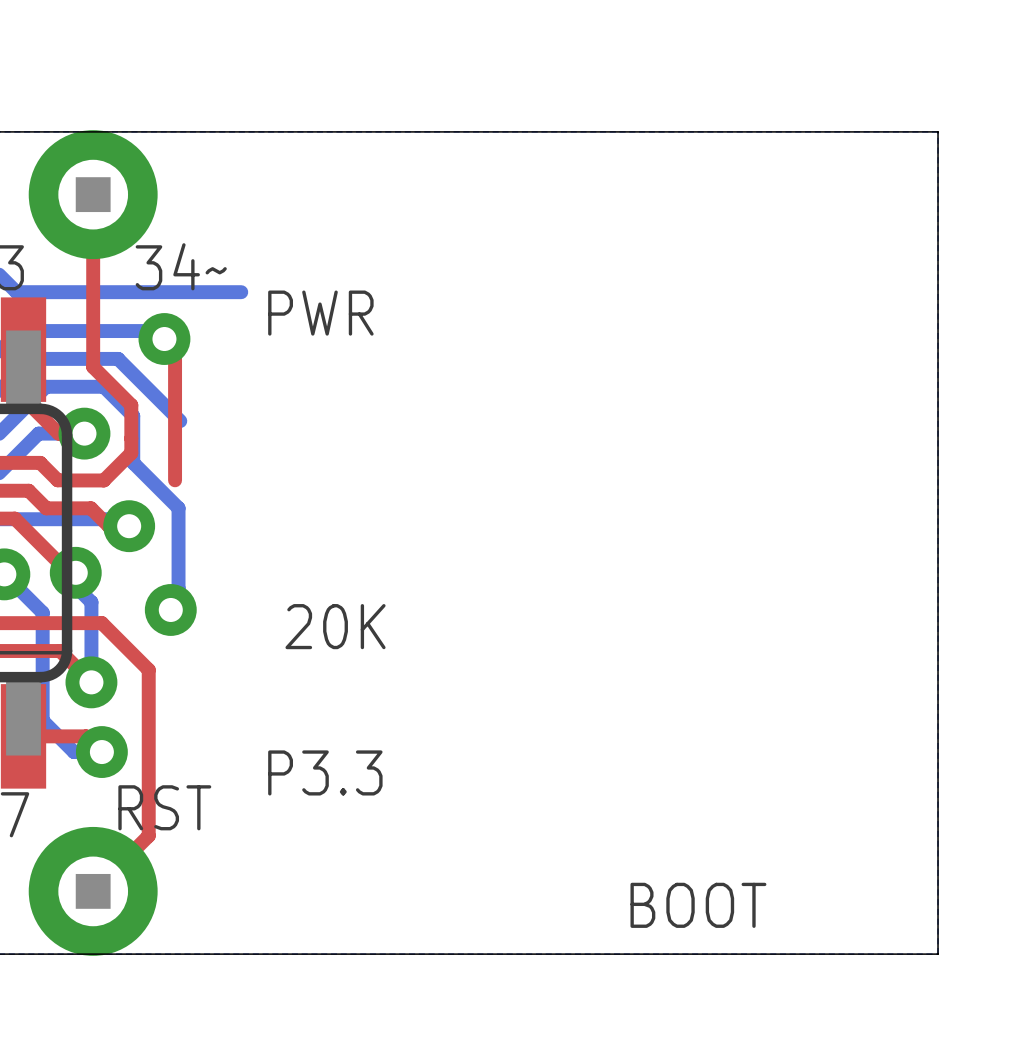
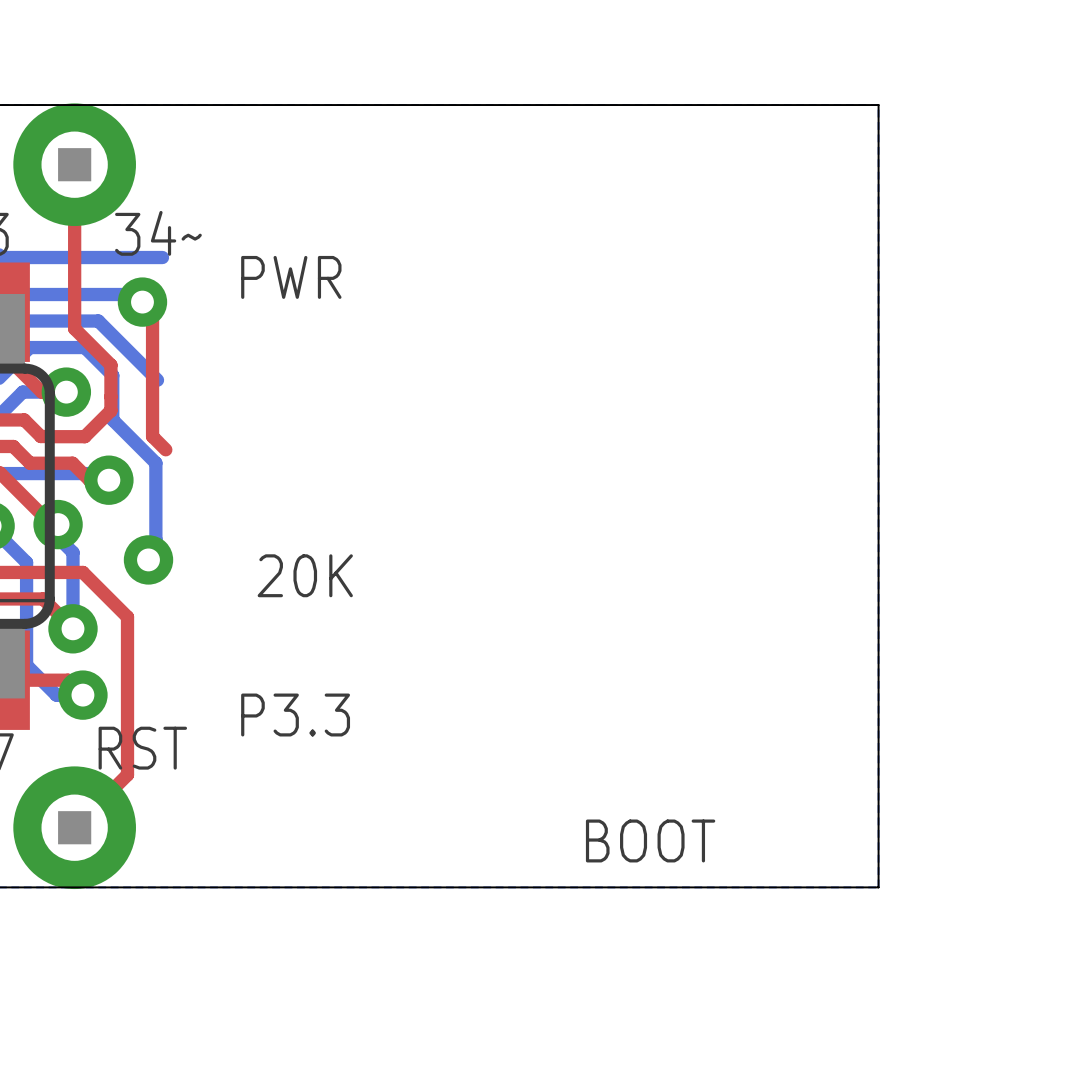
bottom track: (185, 292) (241, 292) -> none
top track: none -> (152, 436) (165, 449)

